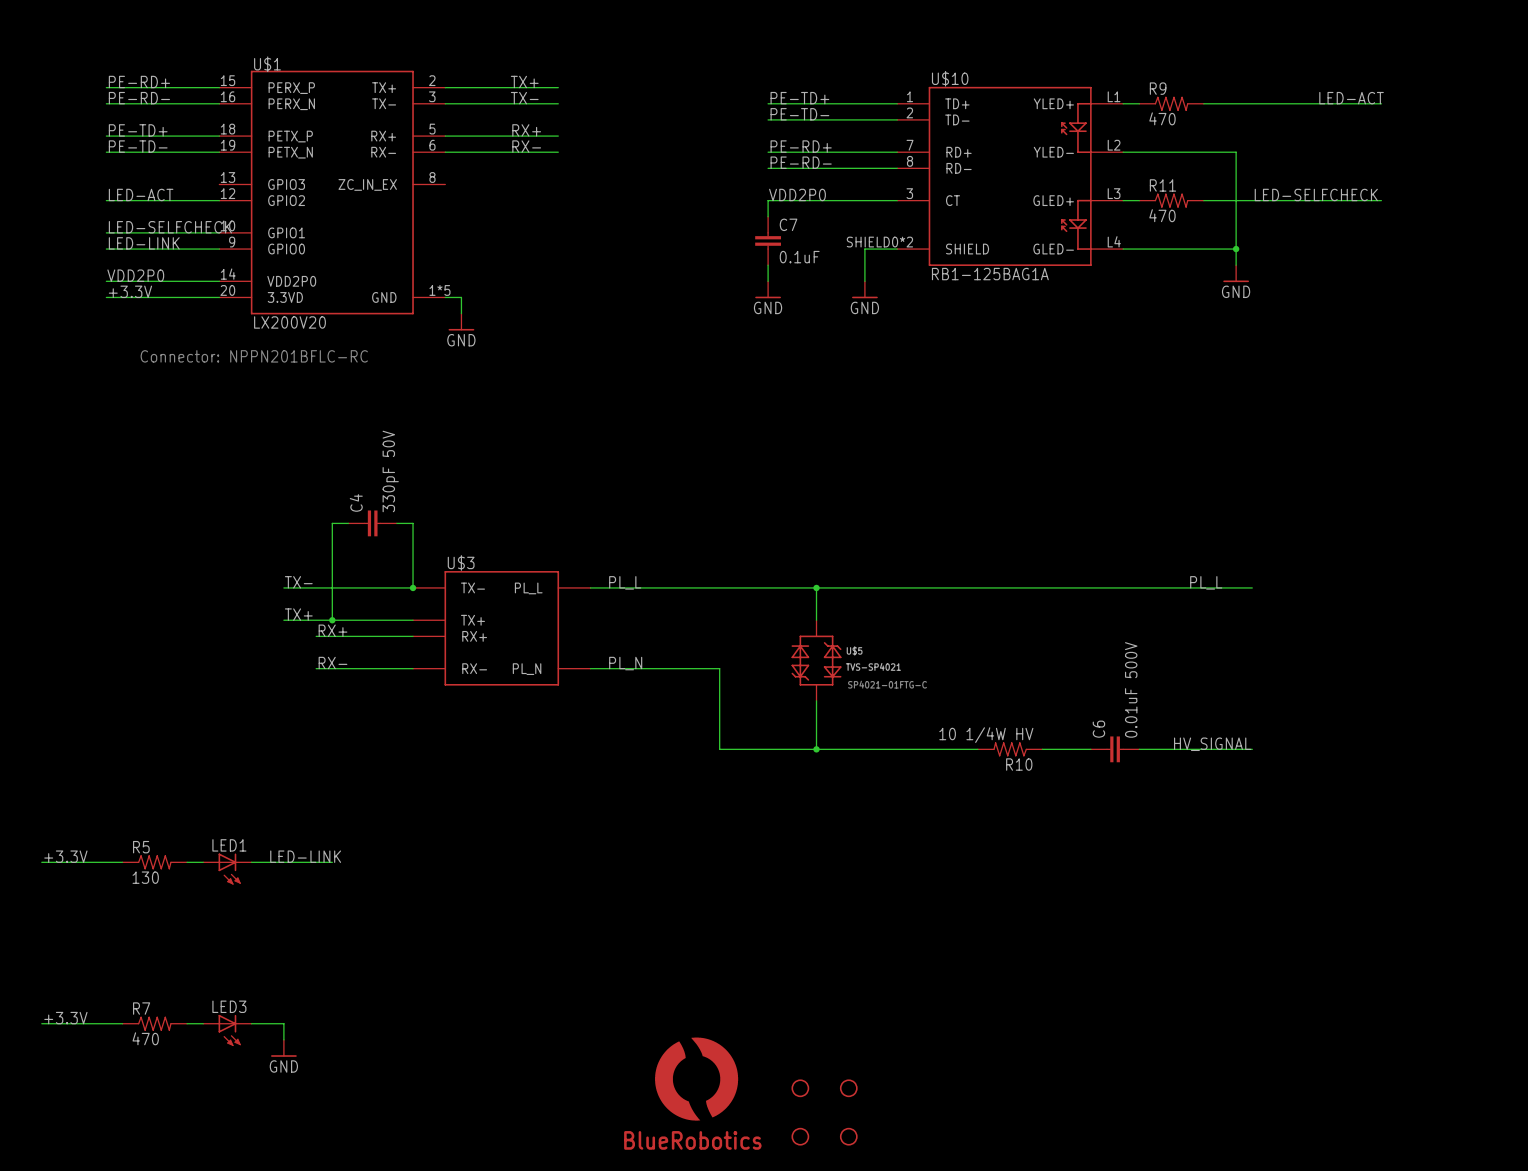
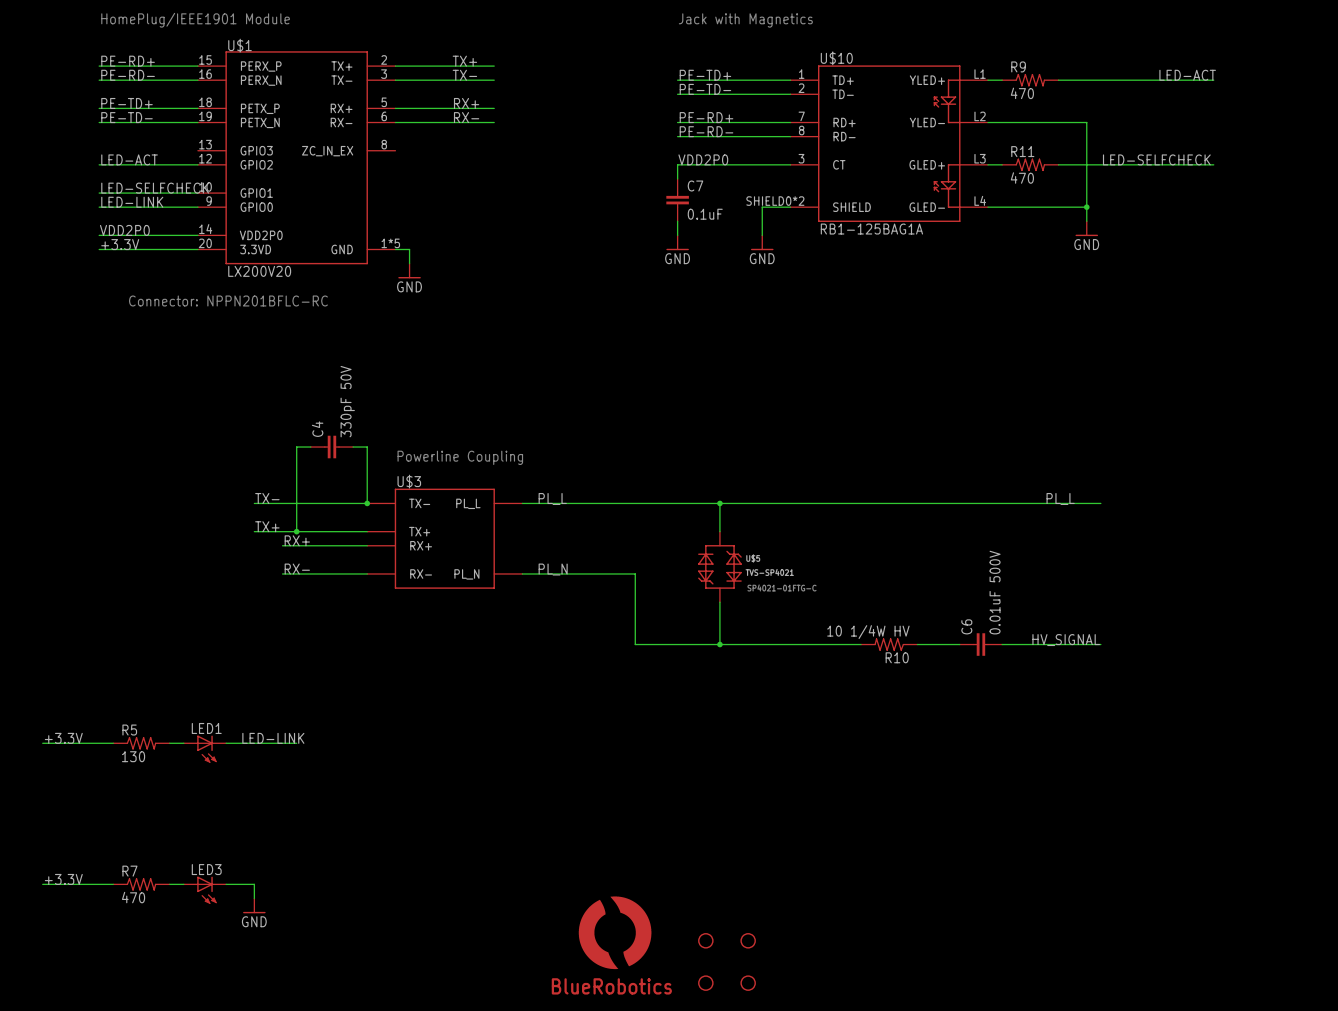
text: none -> HomePlug/IEEE1901 Module (195, 20)
text: none -> Jack with Magnetics (745, 20)
text: none -> Powerline Coupling (460, 457)

